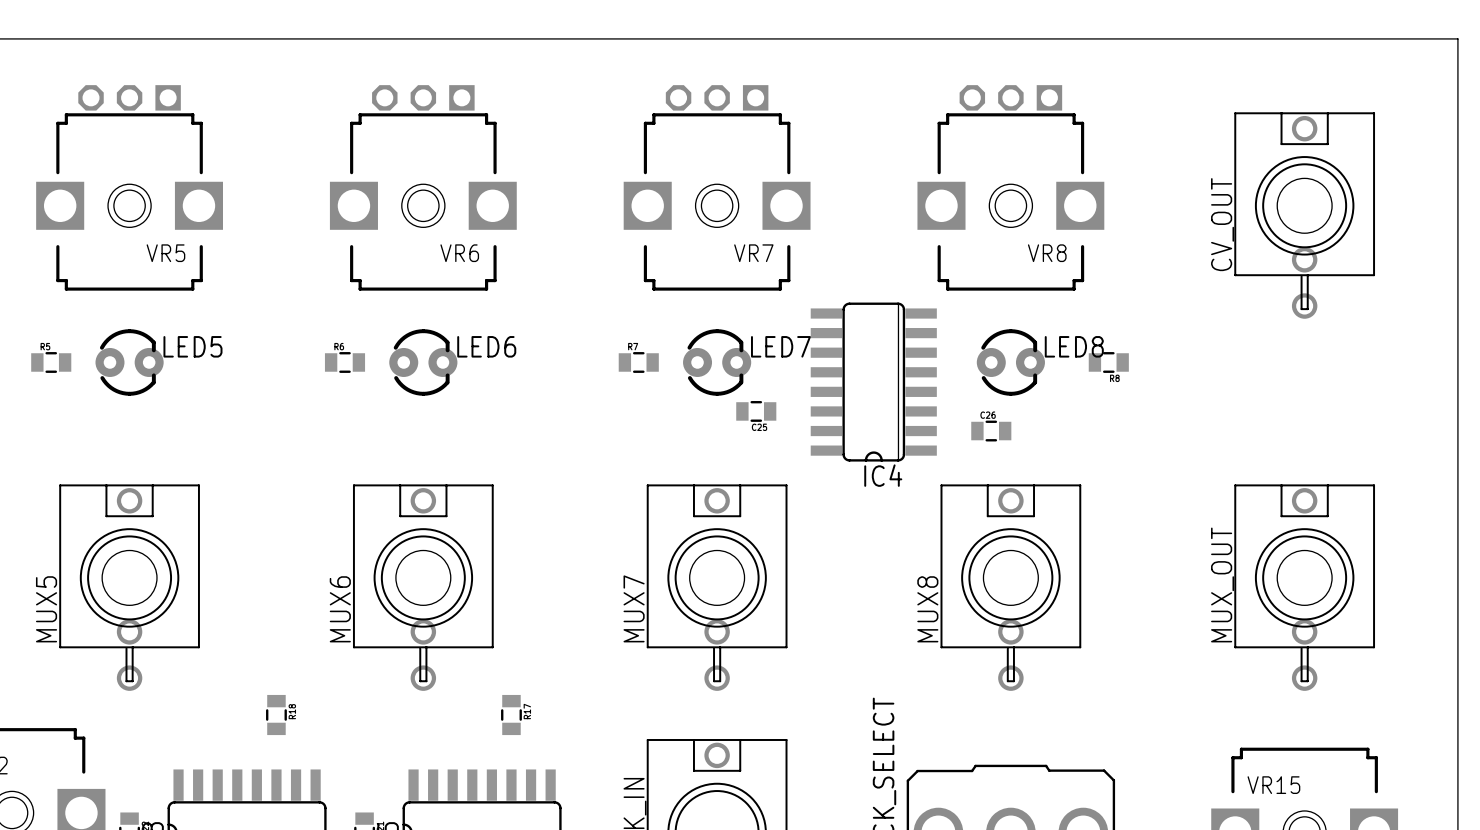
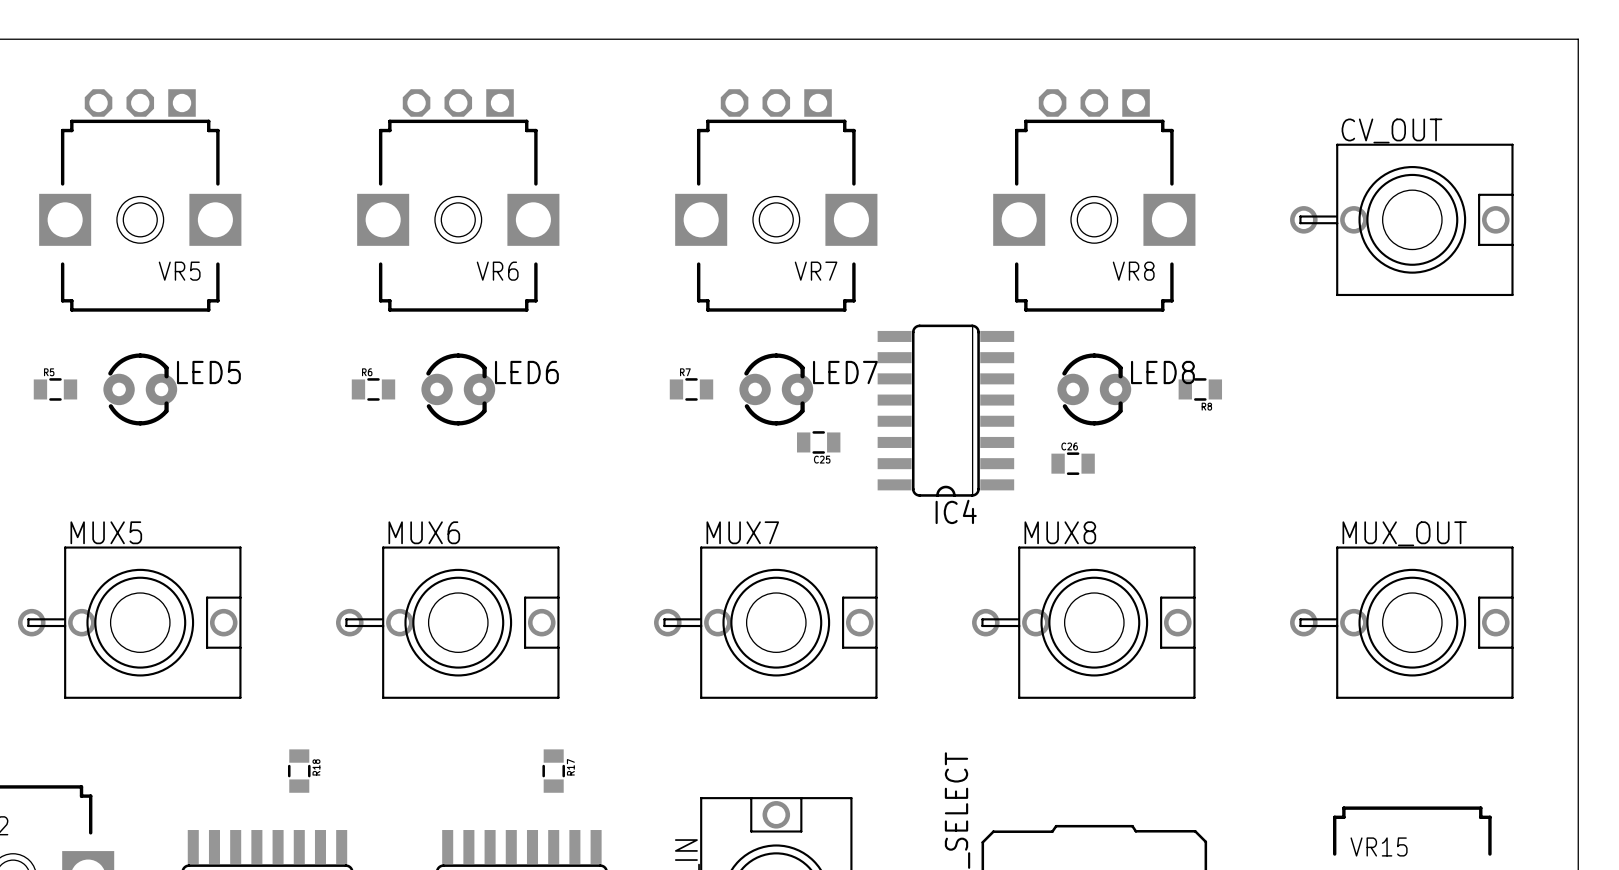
CV_OUT rotation: 0° (1304, 215) -> 90° clockwise (1401, 219)
MUX5 rotation: 0° (129, 587) -> 90° clockwise (129, 622)
MUX6 rotation: 0° (423, 587) -> 90° clockwise (447, 622)
MUX7 rotation: 0° (717, 587) -> 90° clockwise (765, 622)
MUX8 rotation: 0° (1010, 587) -> 90° clockwise (1083, 622)
MUX_OUT rotation: 0° (1304, 587) -> 90° clockwise (1401, 622)

